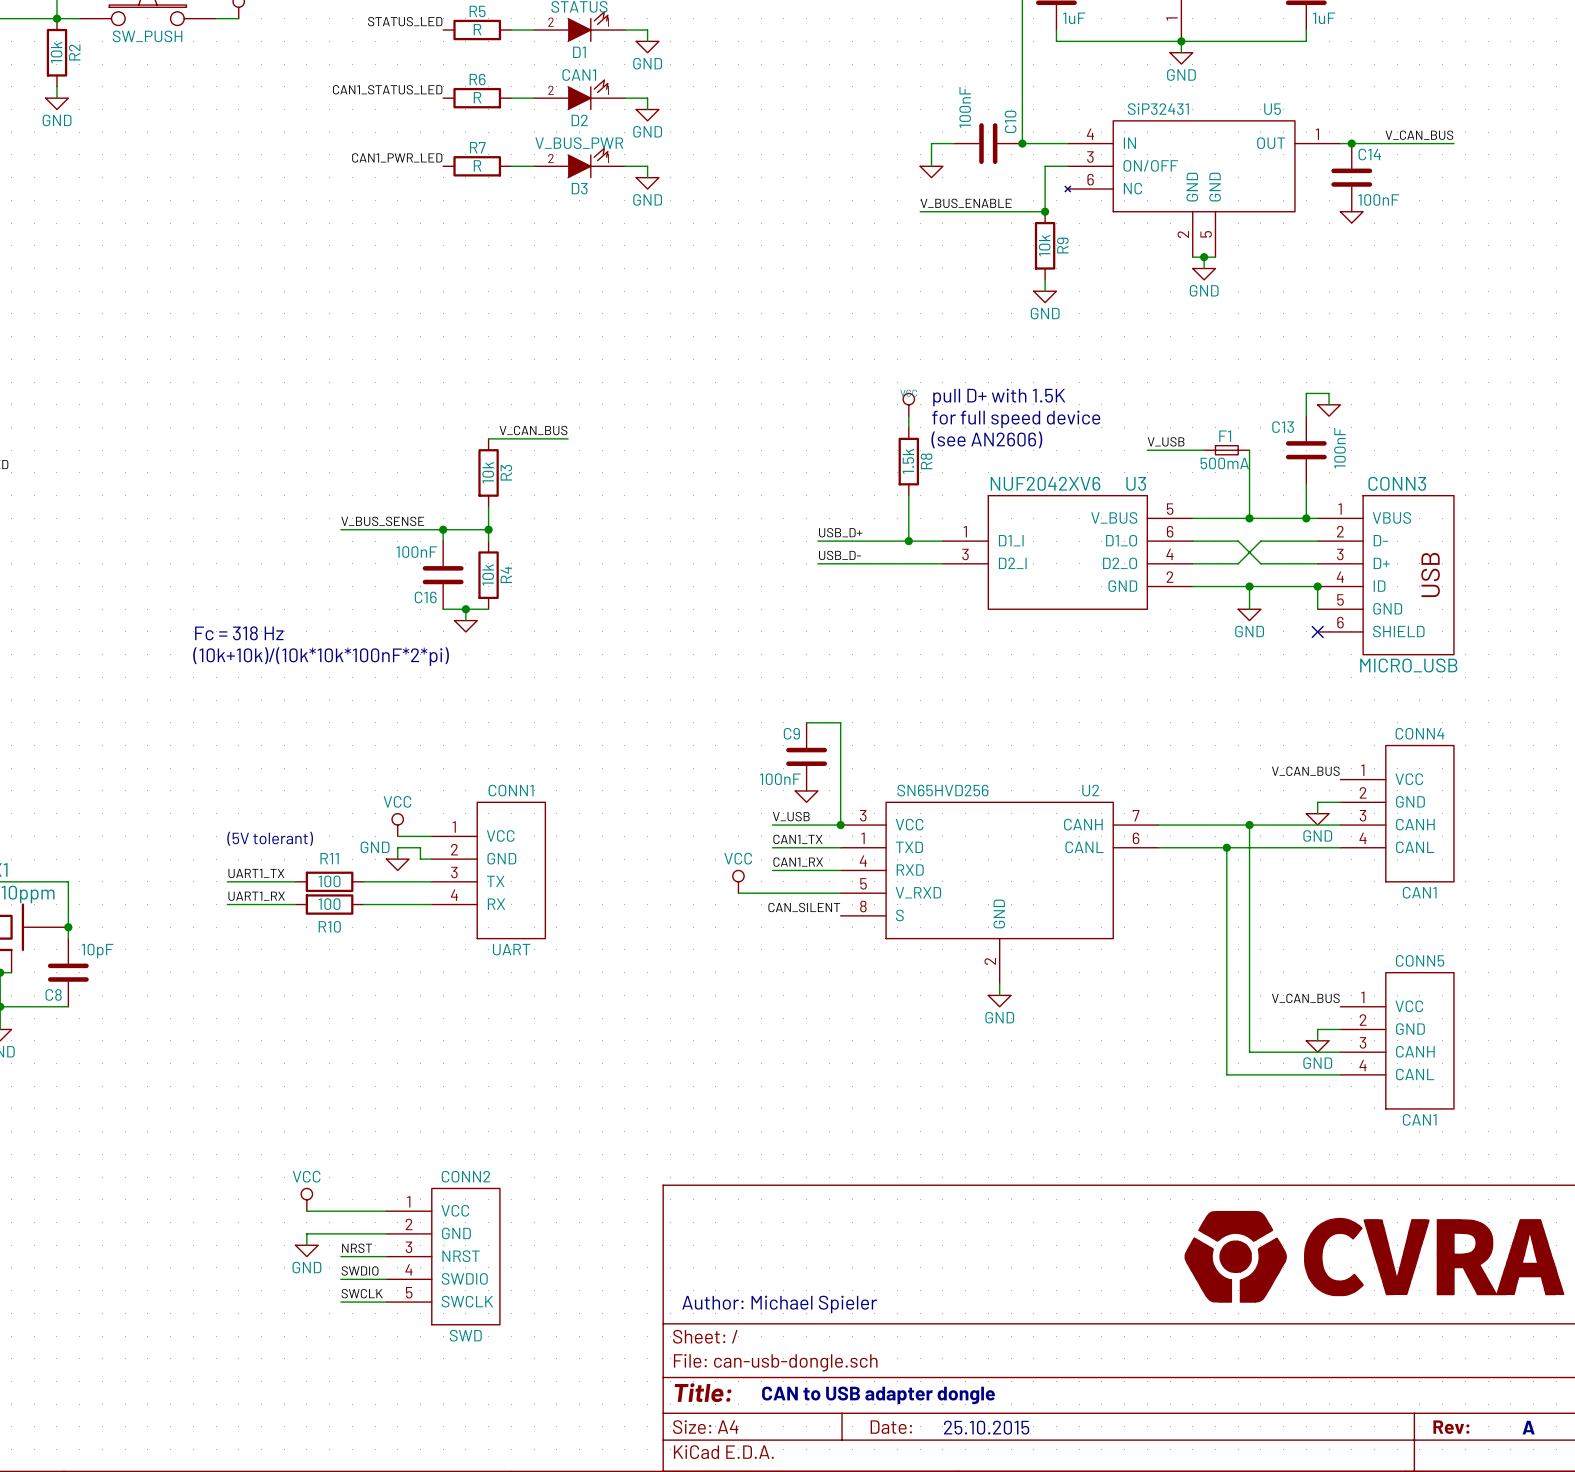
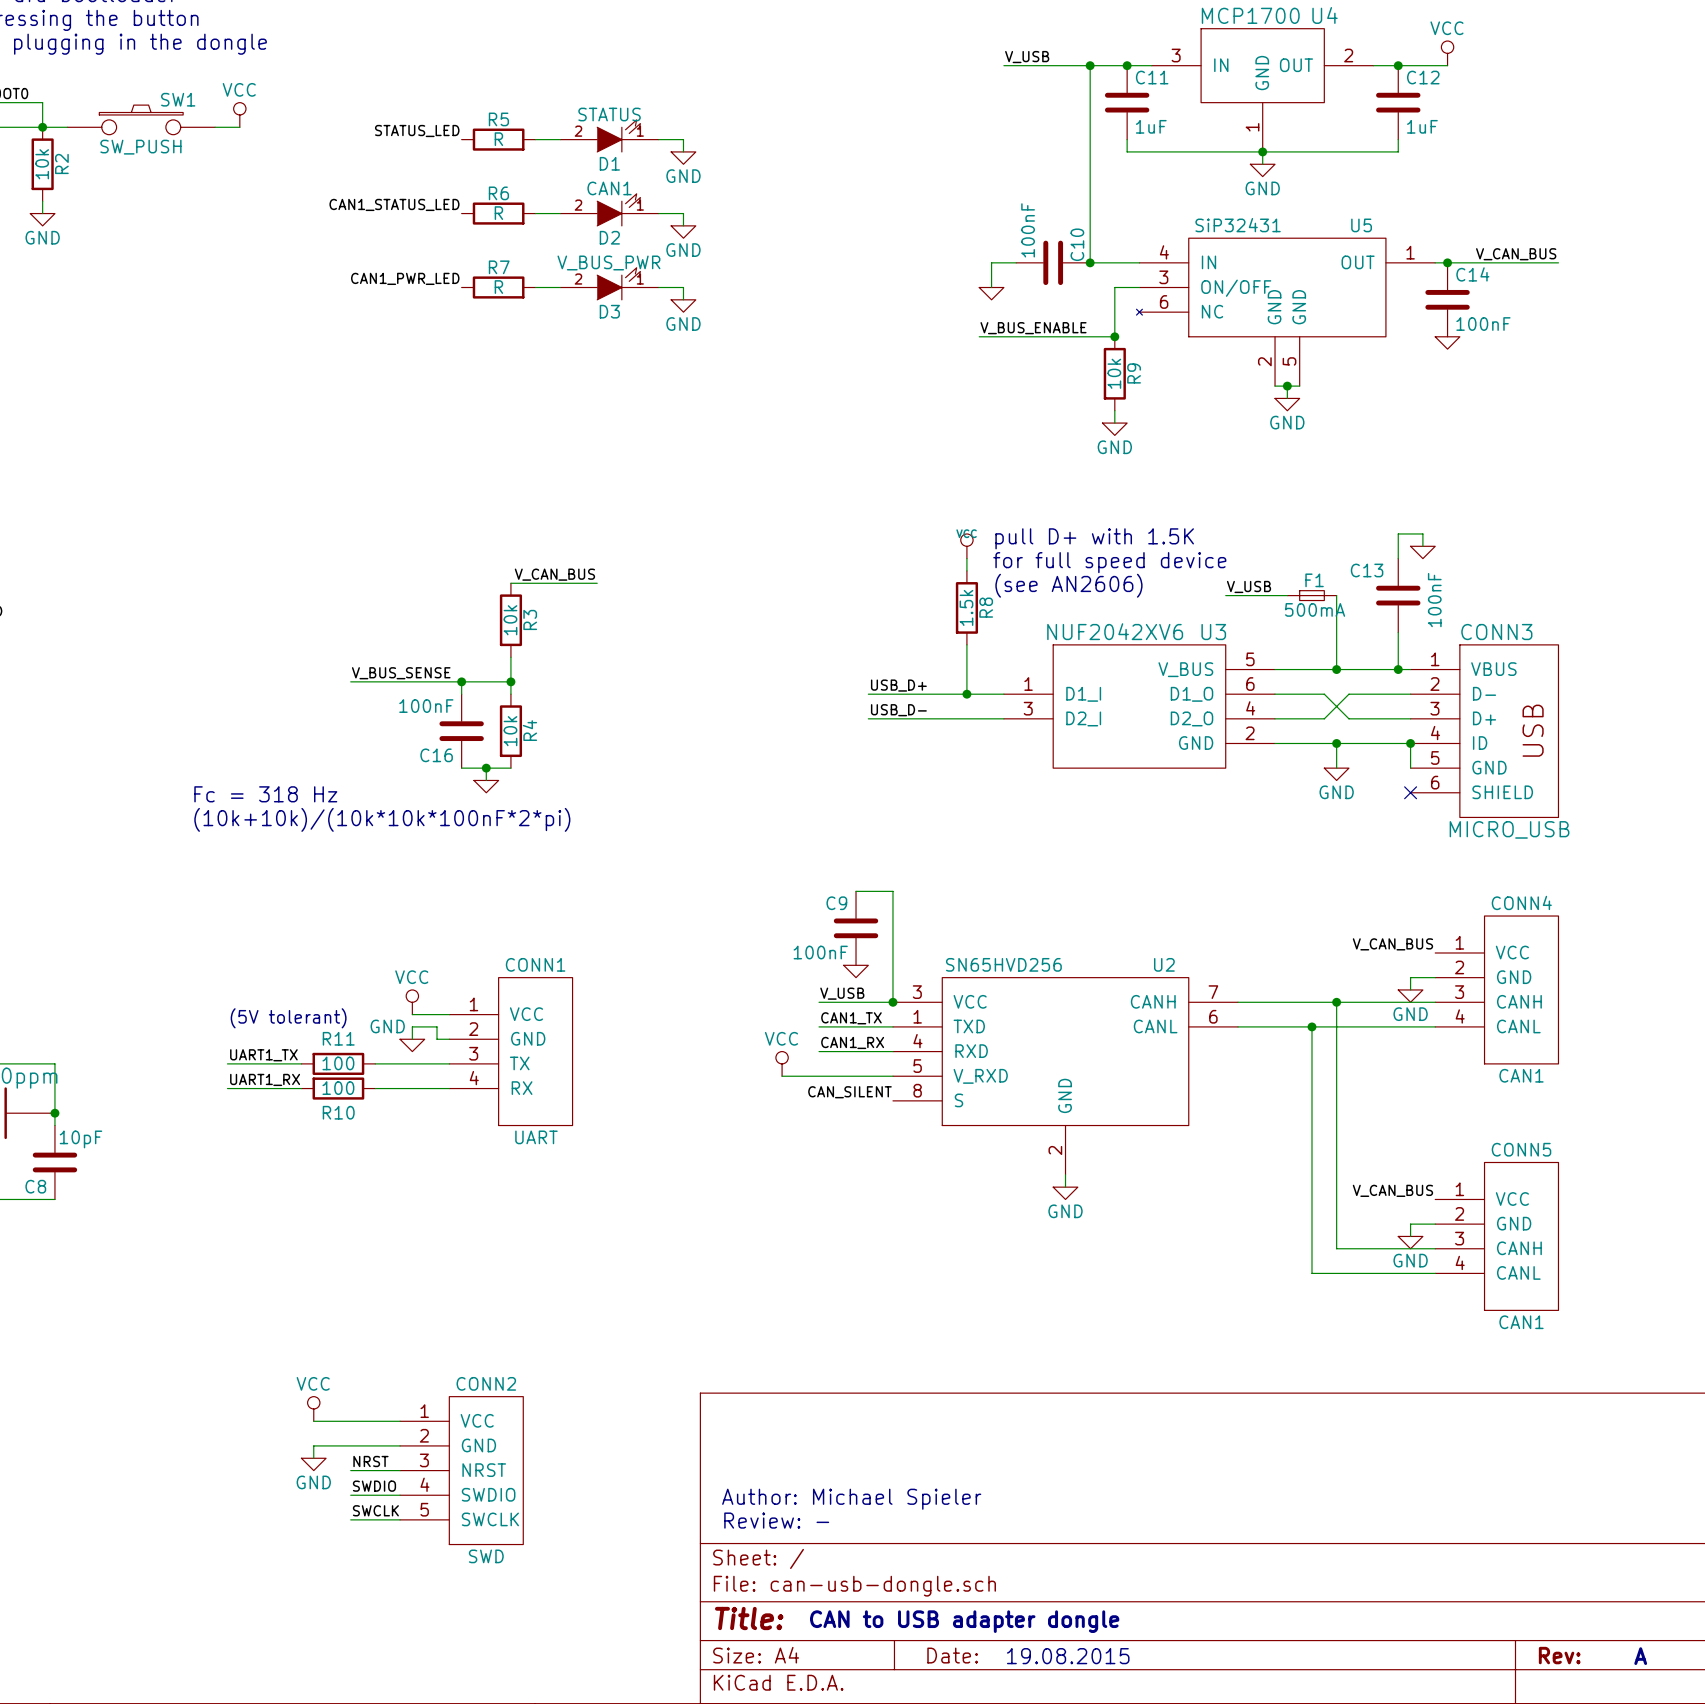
power symbol: (1374, 1256) -> none
text: none -> Author: Michael Spieler (851, 1499)
text: Author: Michael Spieler (779, 1304) -> Review: - (776, 1520)
text: 25.10.2015 (986, 1427) -> 19.08.2015 (1068, 1656)

